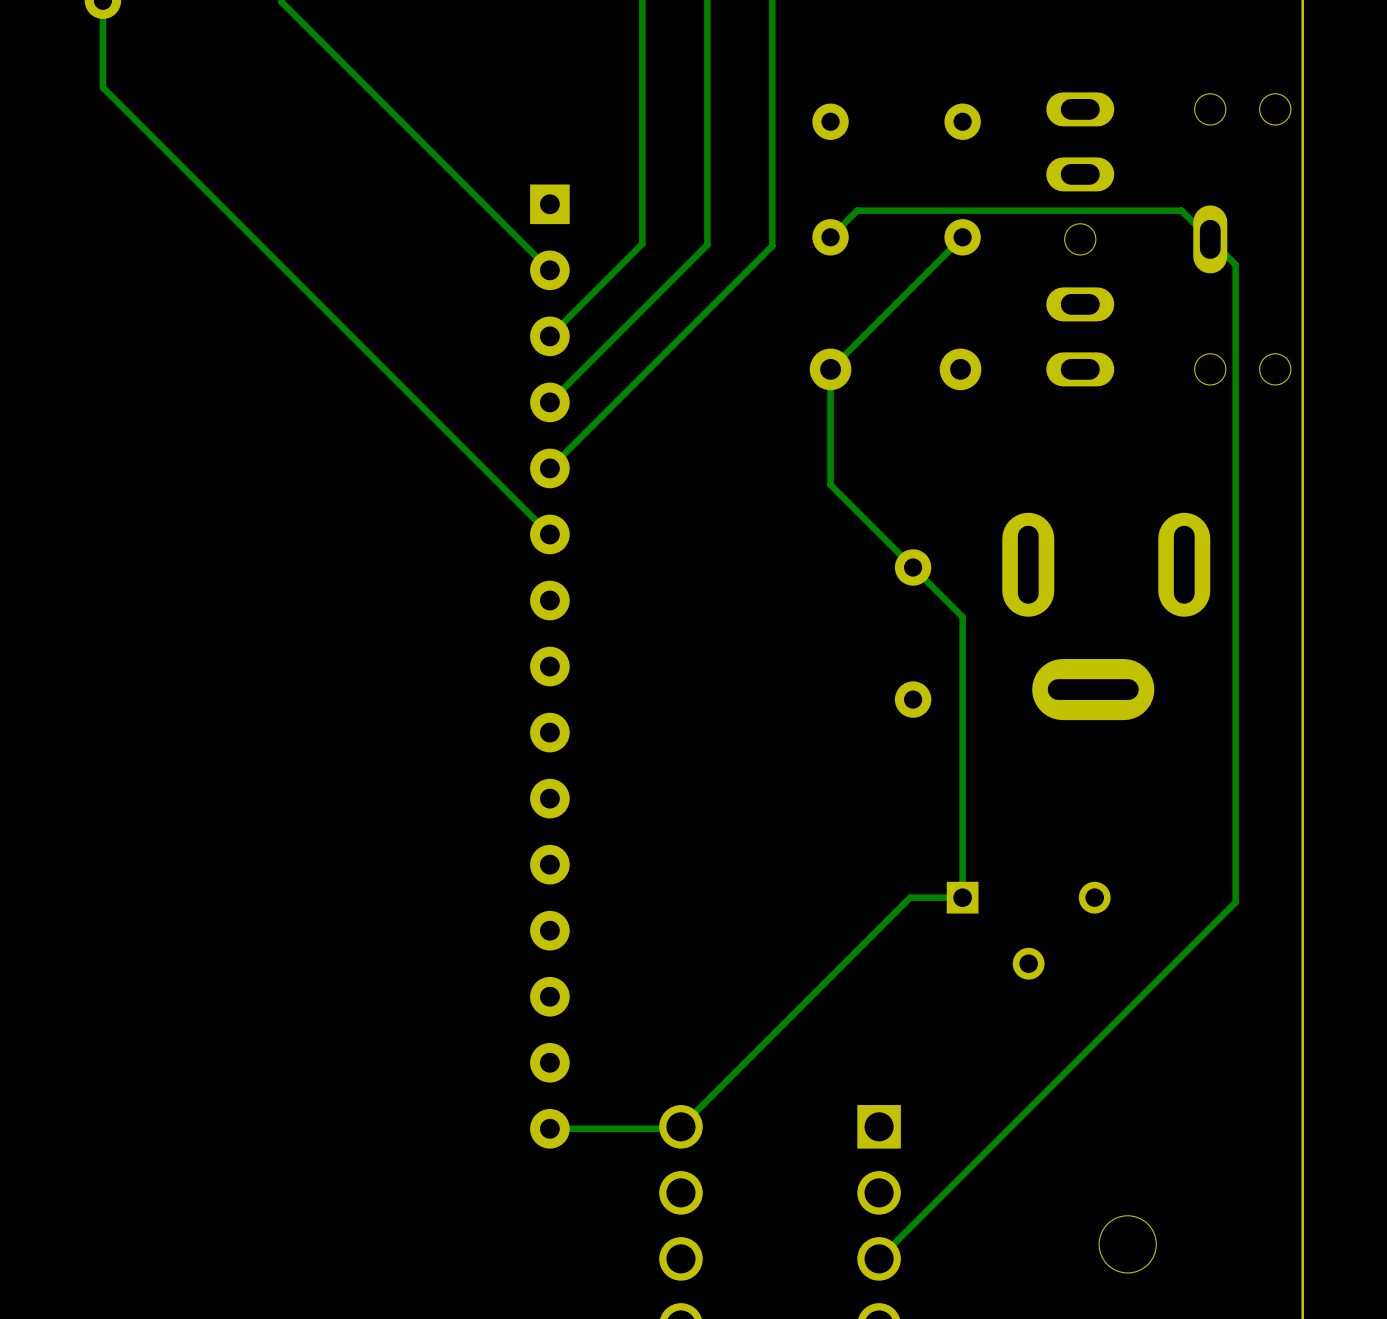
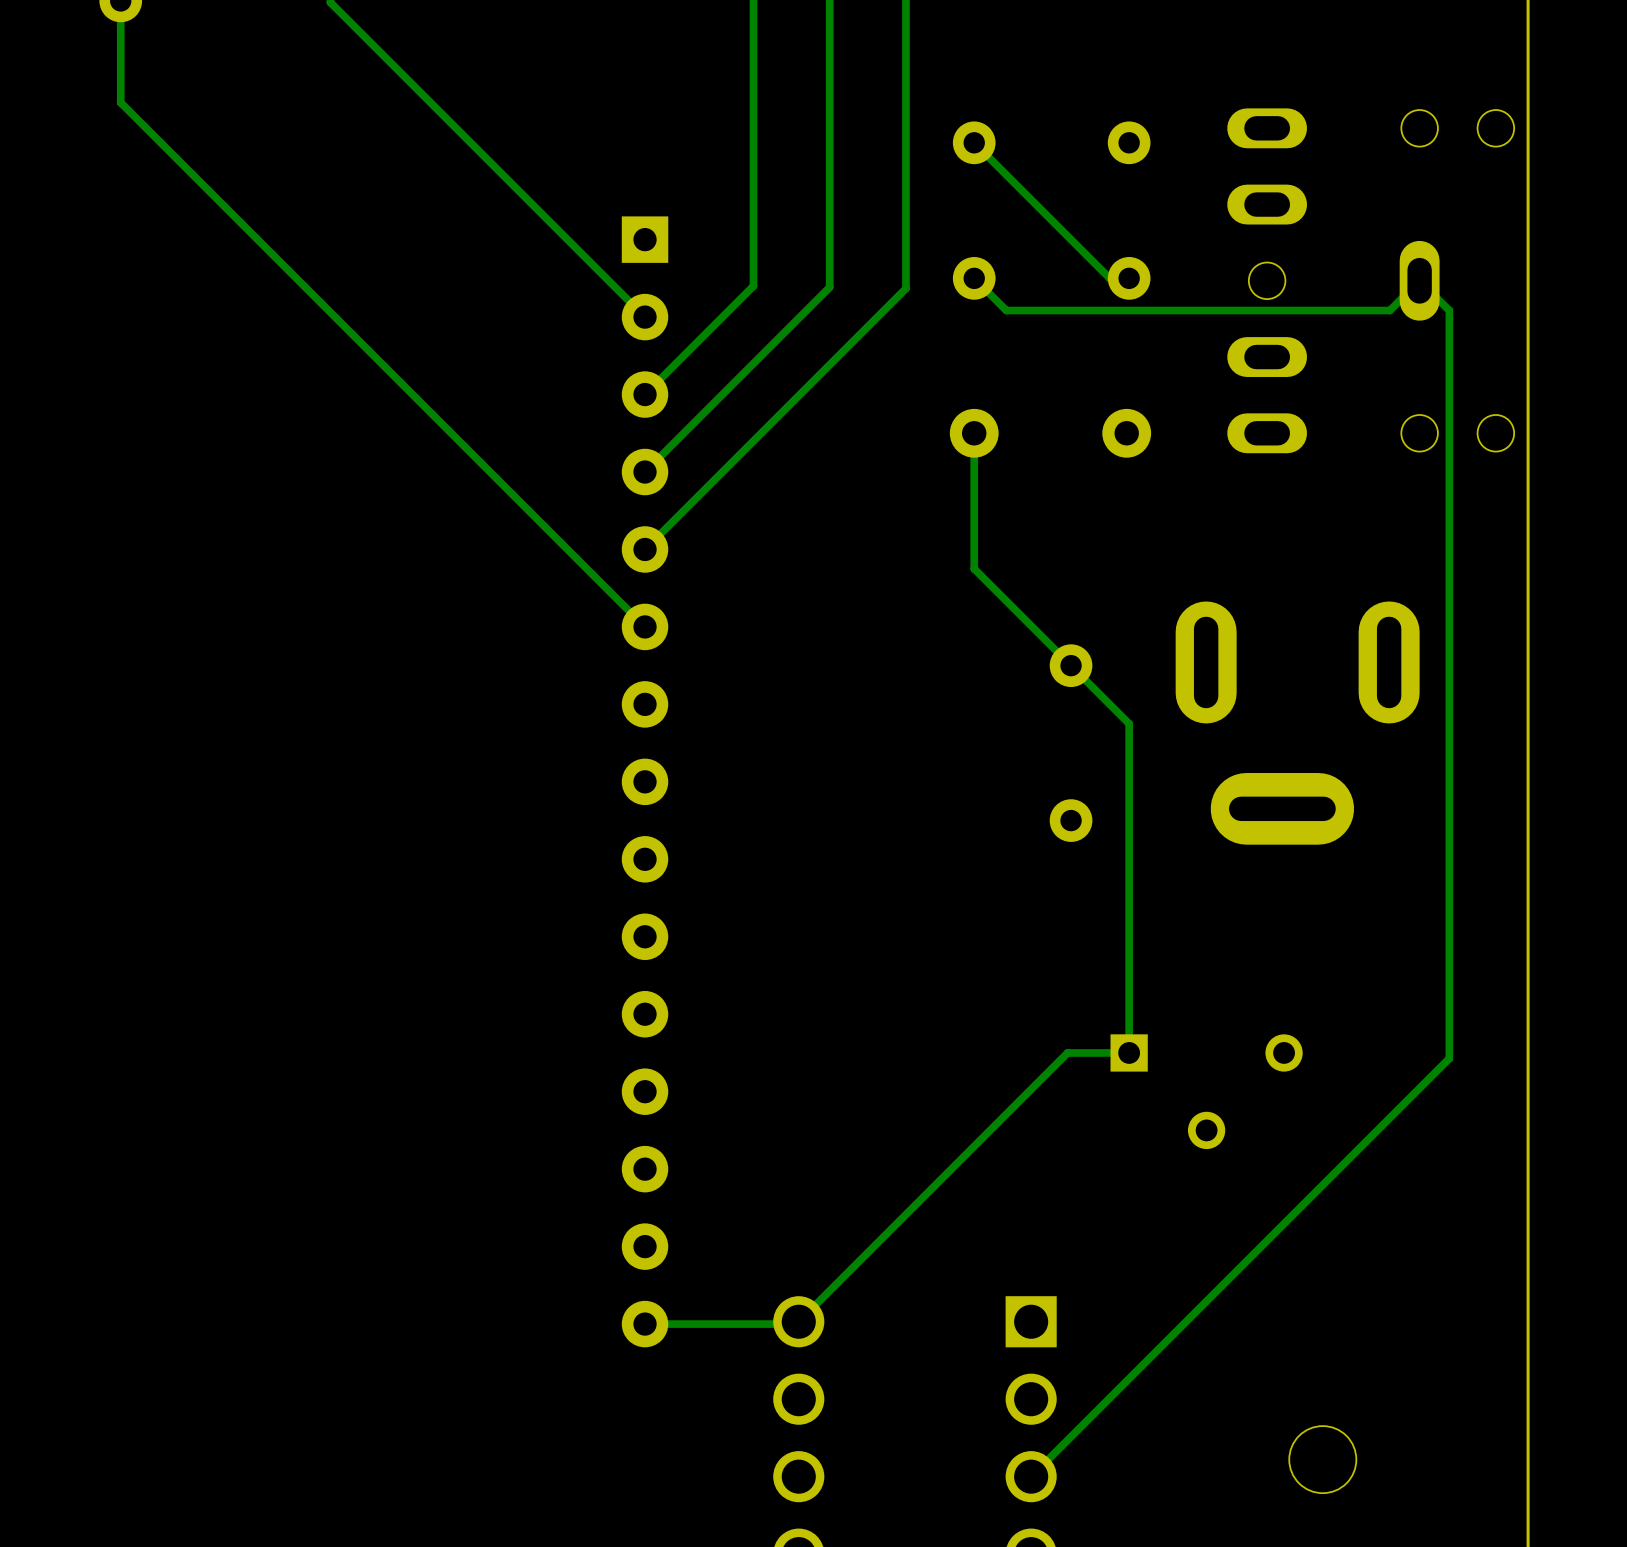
track: (830, 237) (857, 210) (1181, 210) (1210, 239) -> (974, 278) (1006, 310) (1389, 310) (1419, 280)
track: (962, 237) (830, 369) -> (1129, 278) (1109, 278) (974, 142)

